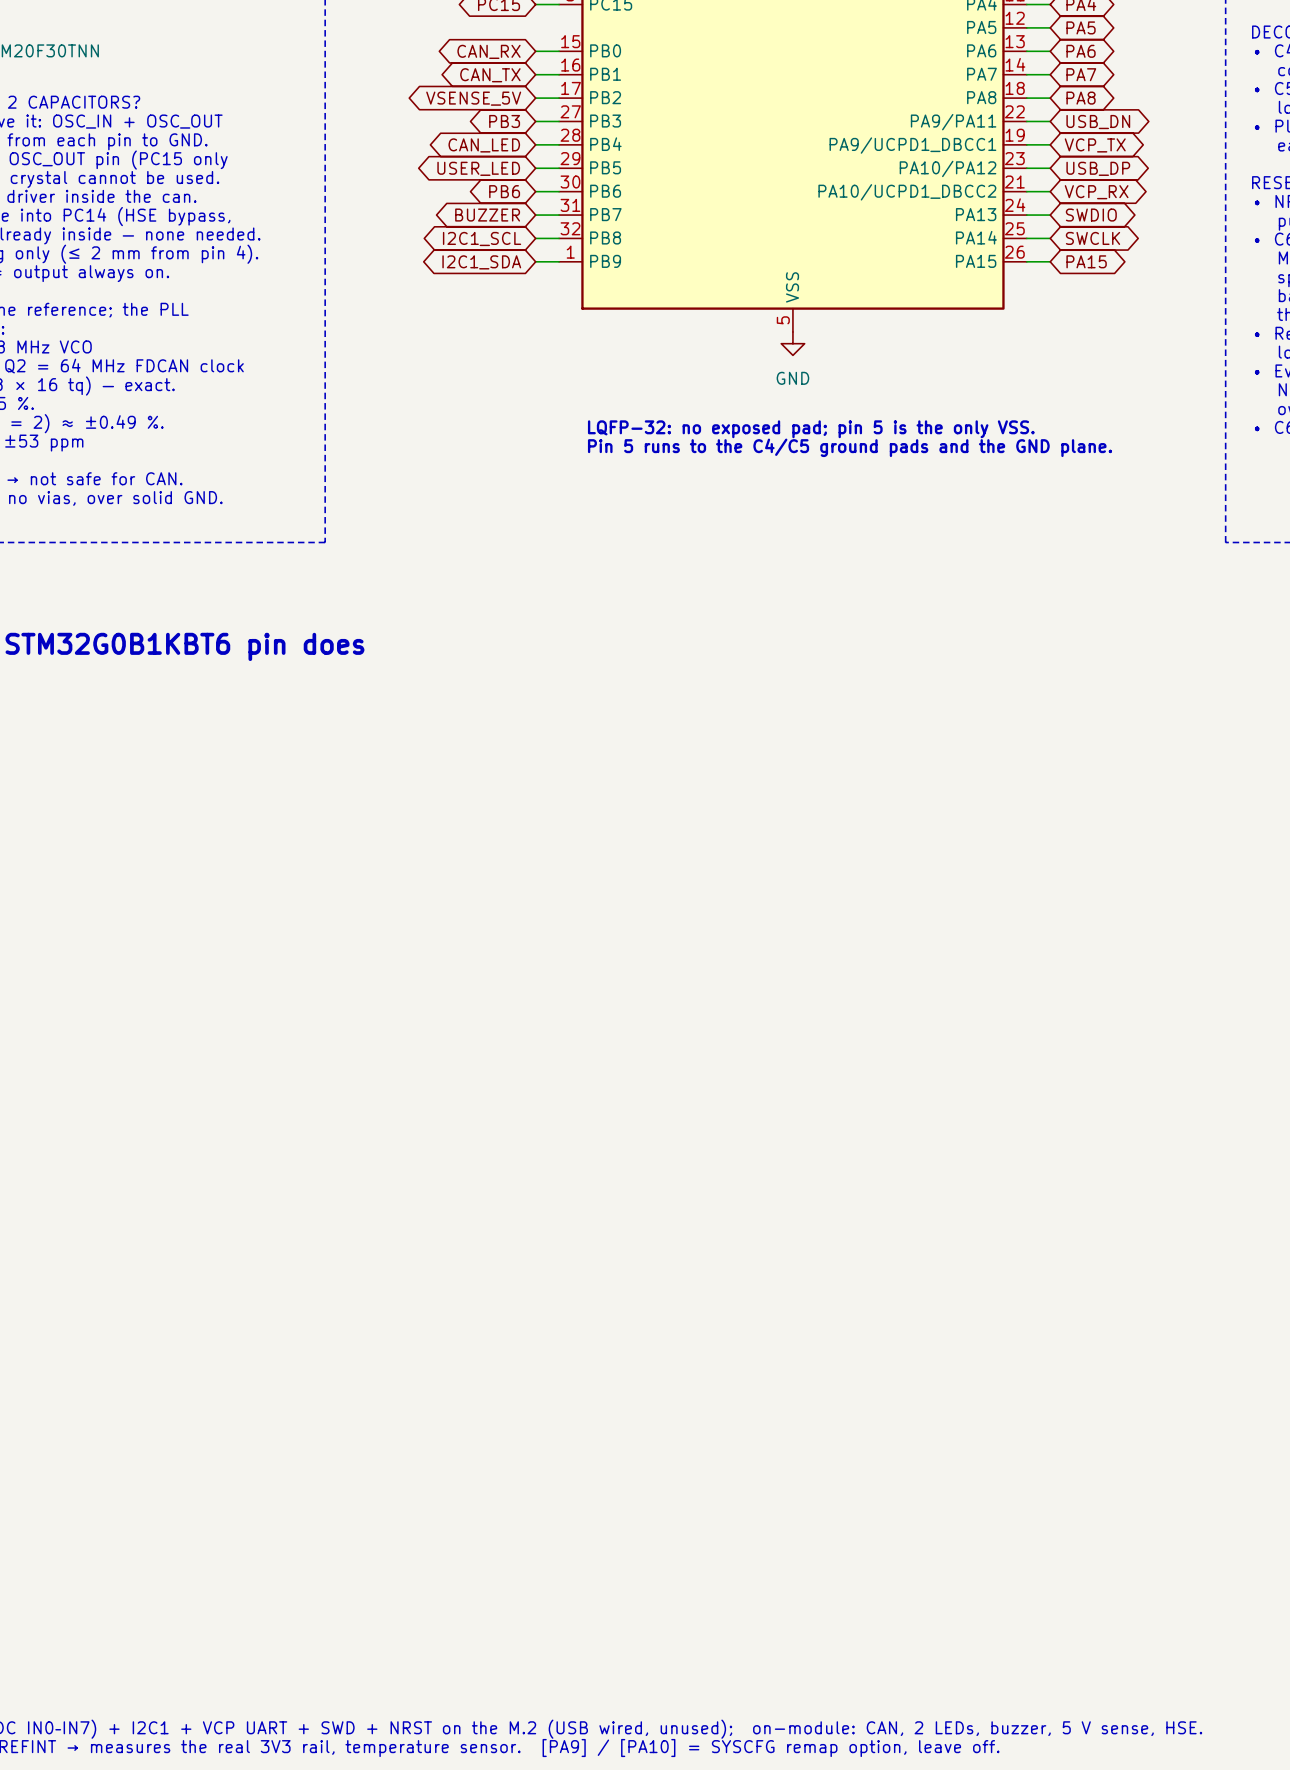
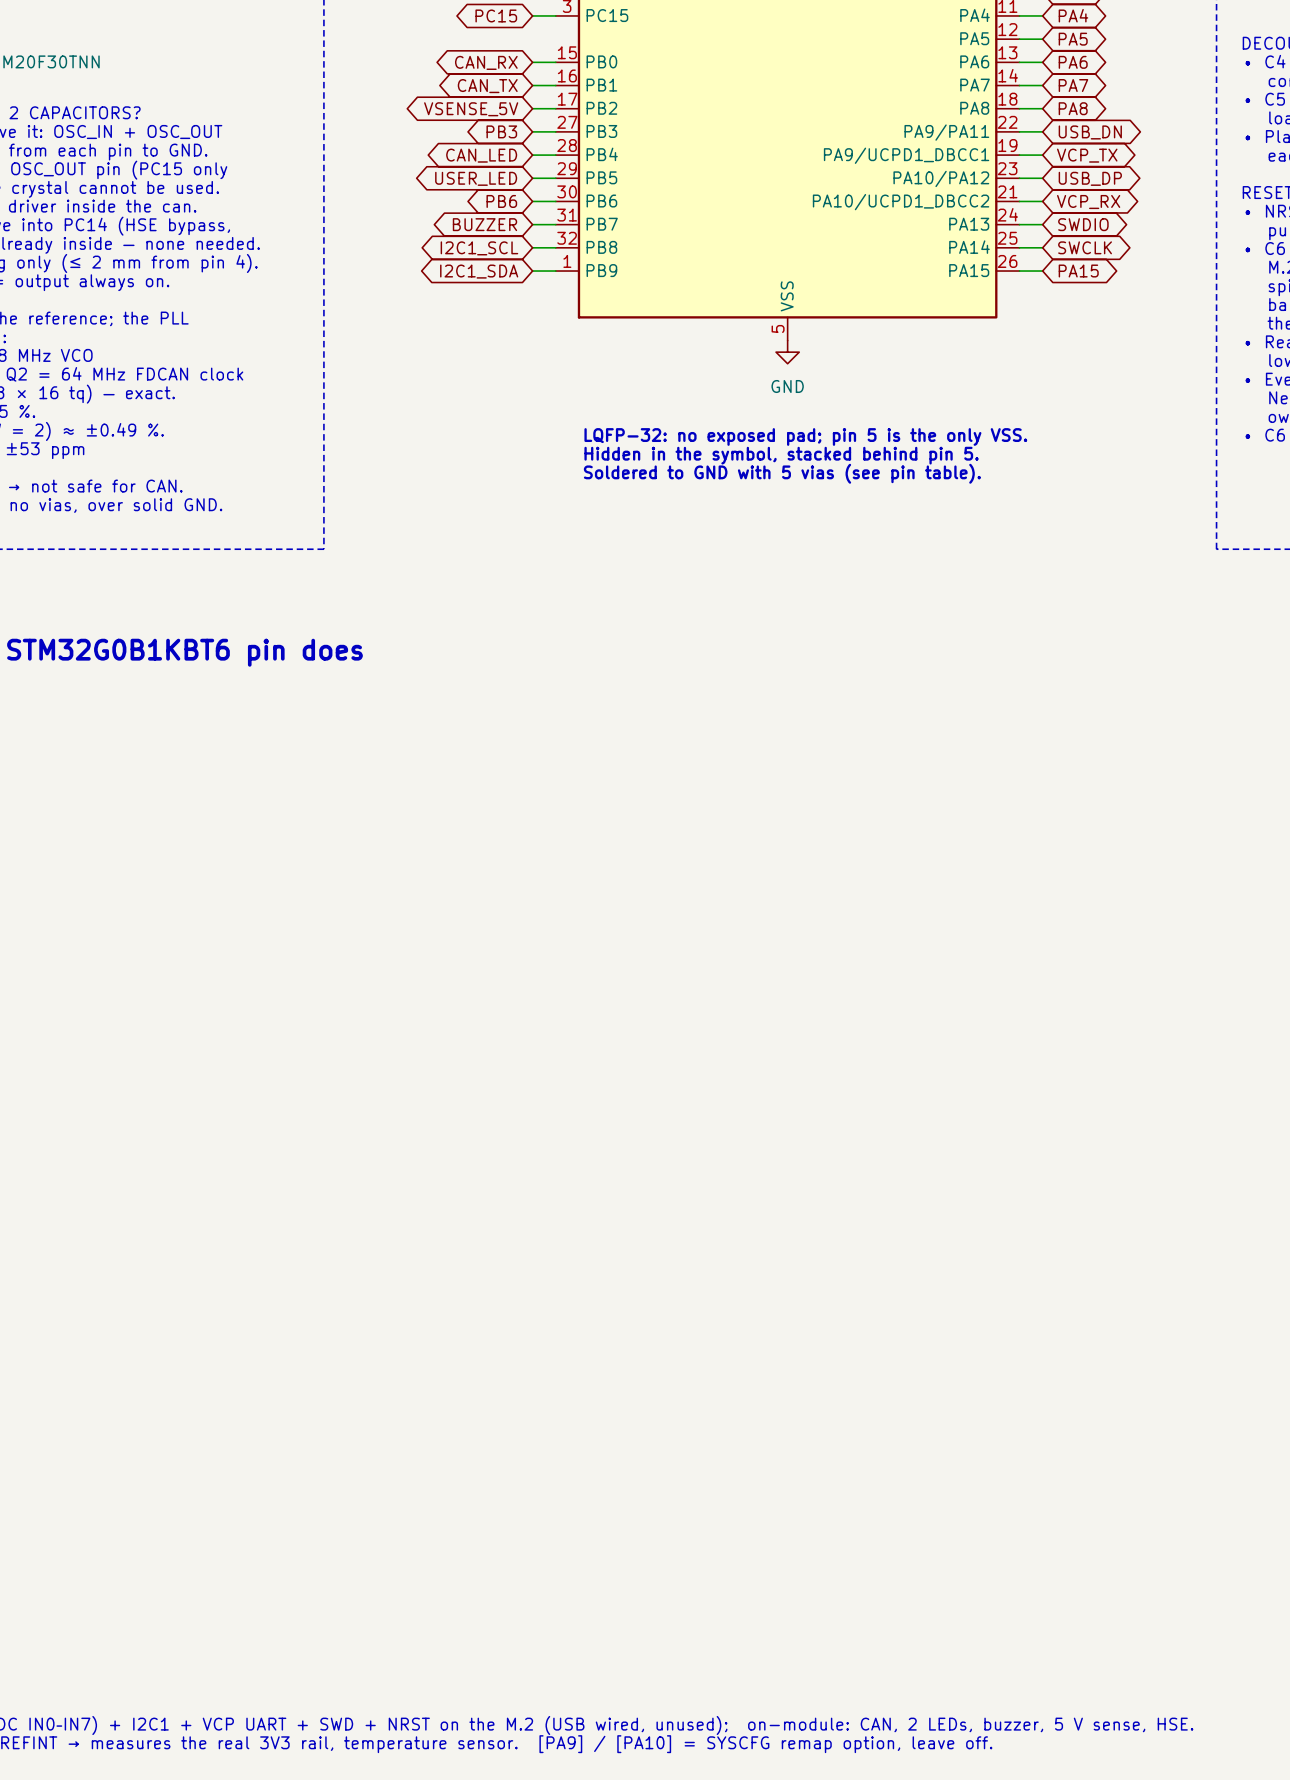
text: Pin 5 runs to the C4/C5 ground pads and the GND plane. (850, 447) -> Hidden in the symbol, stacked behind pin 5. (781, 455)
text: none -> Soldered to GND with 5 vias (see pin table). (782, 473)

